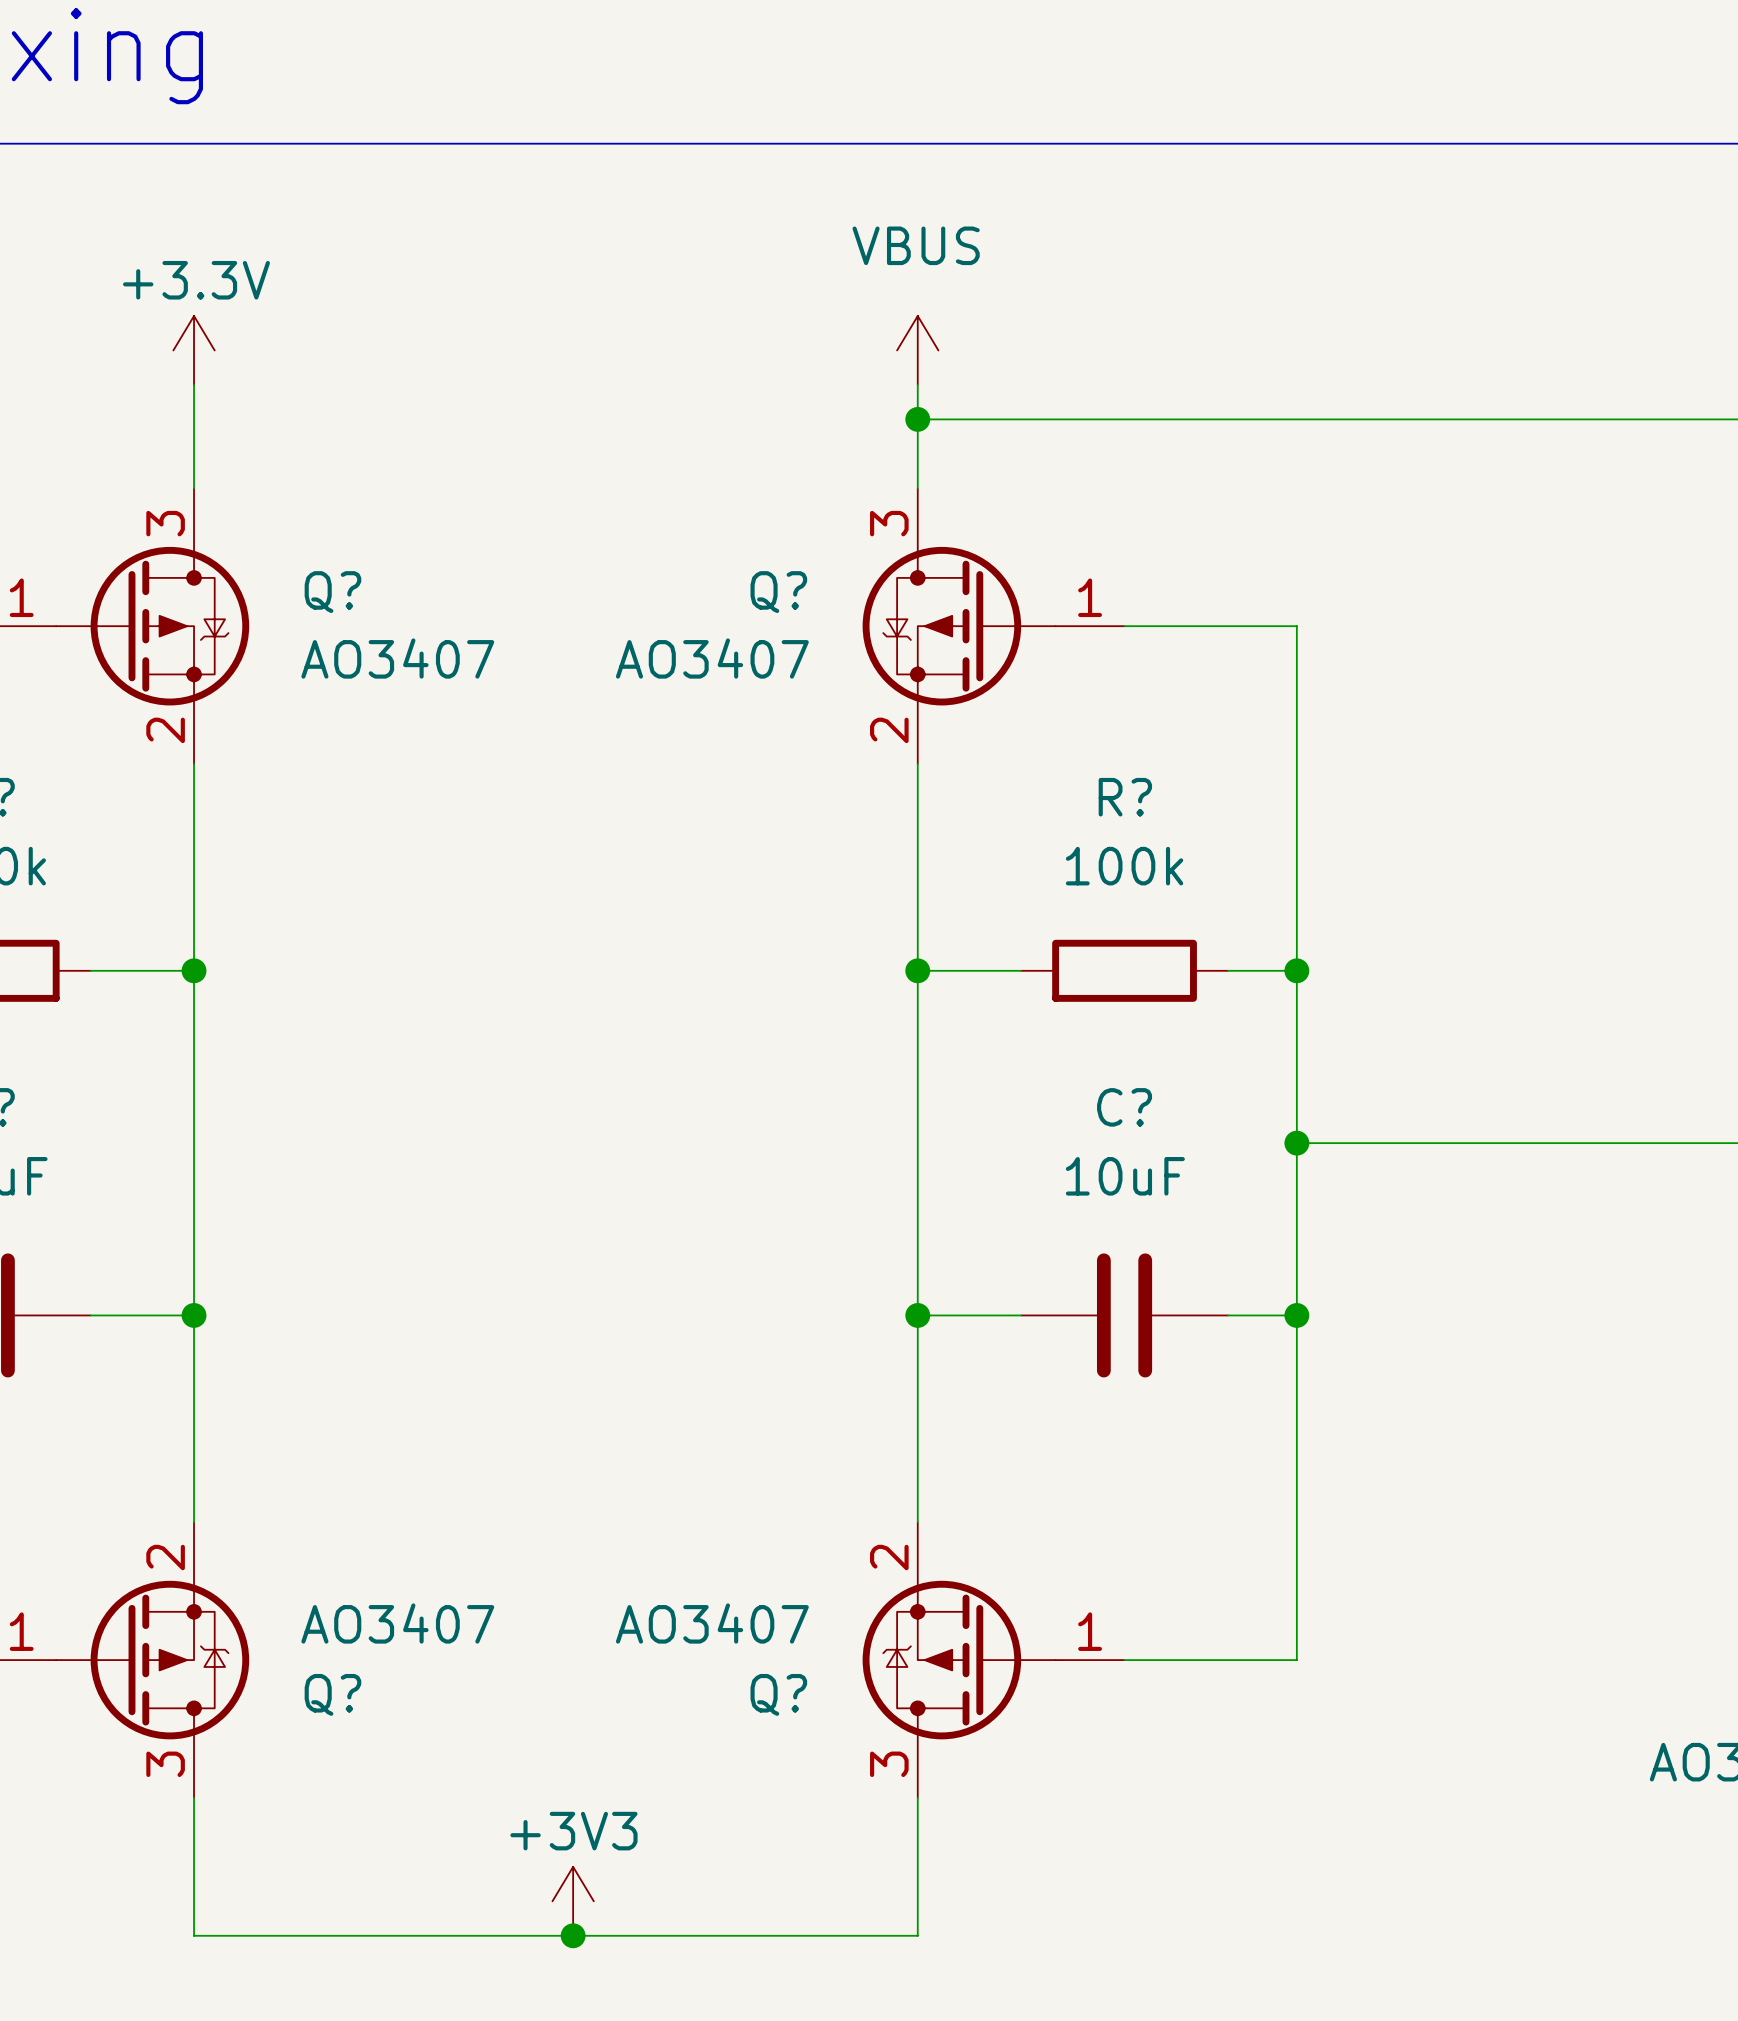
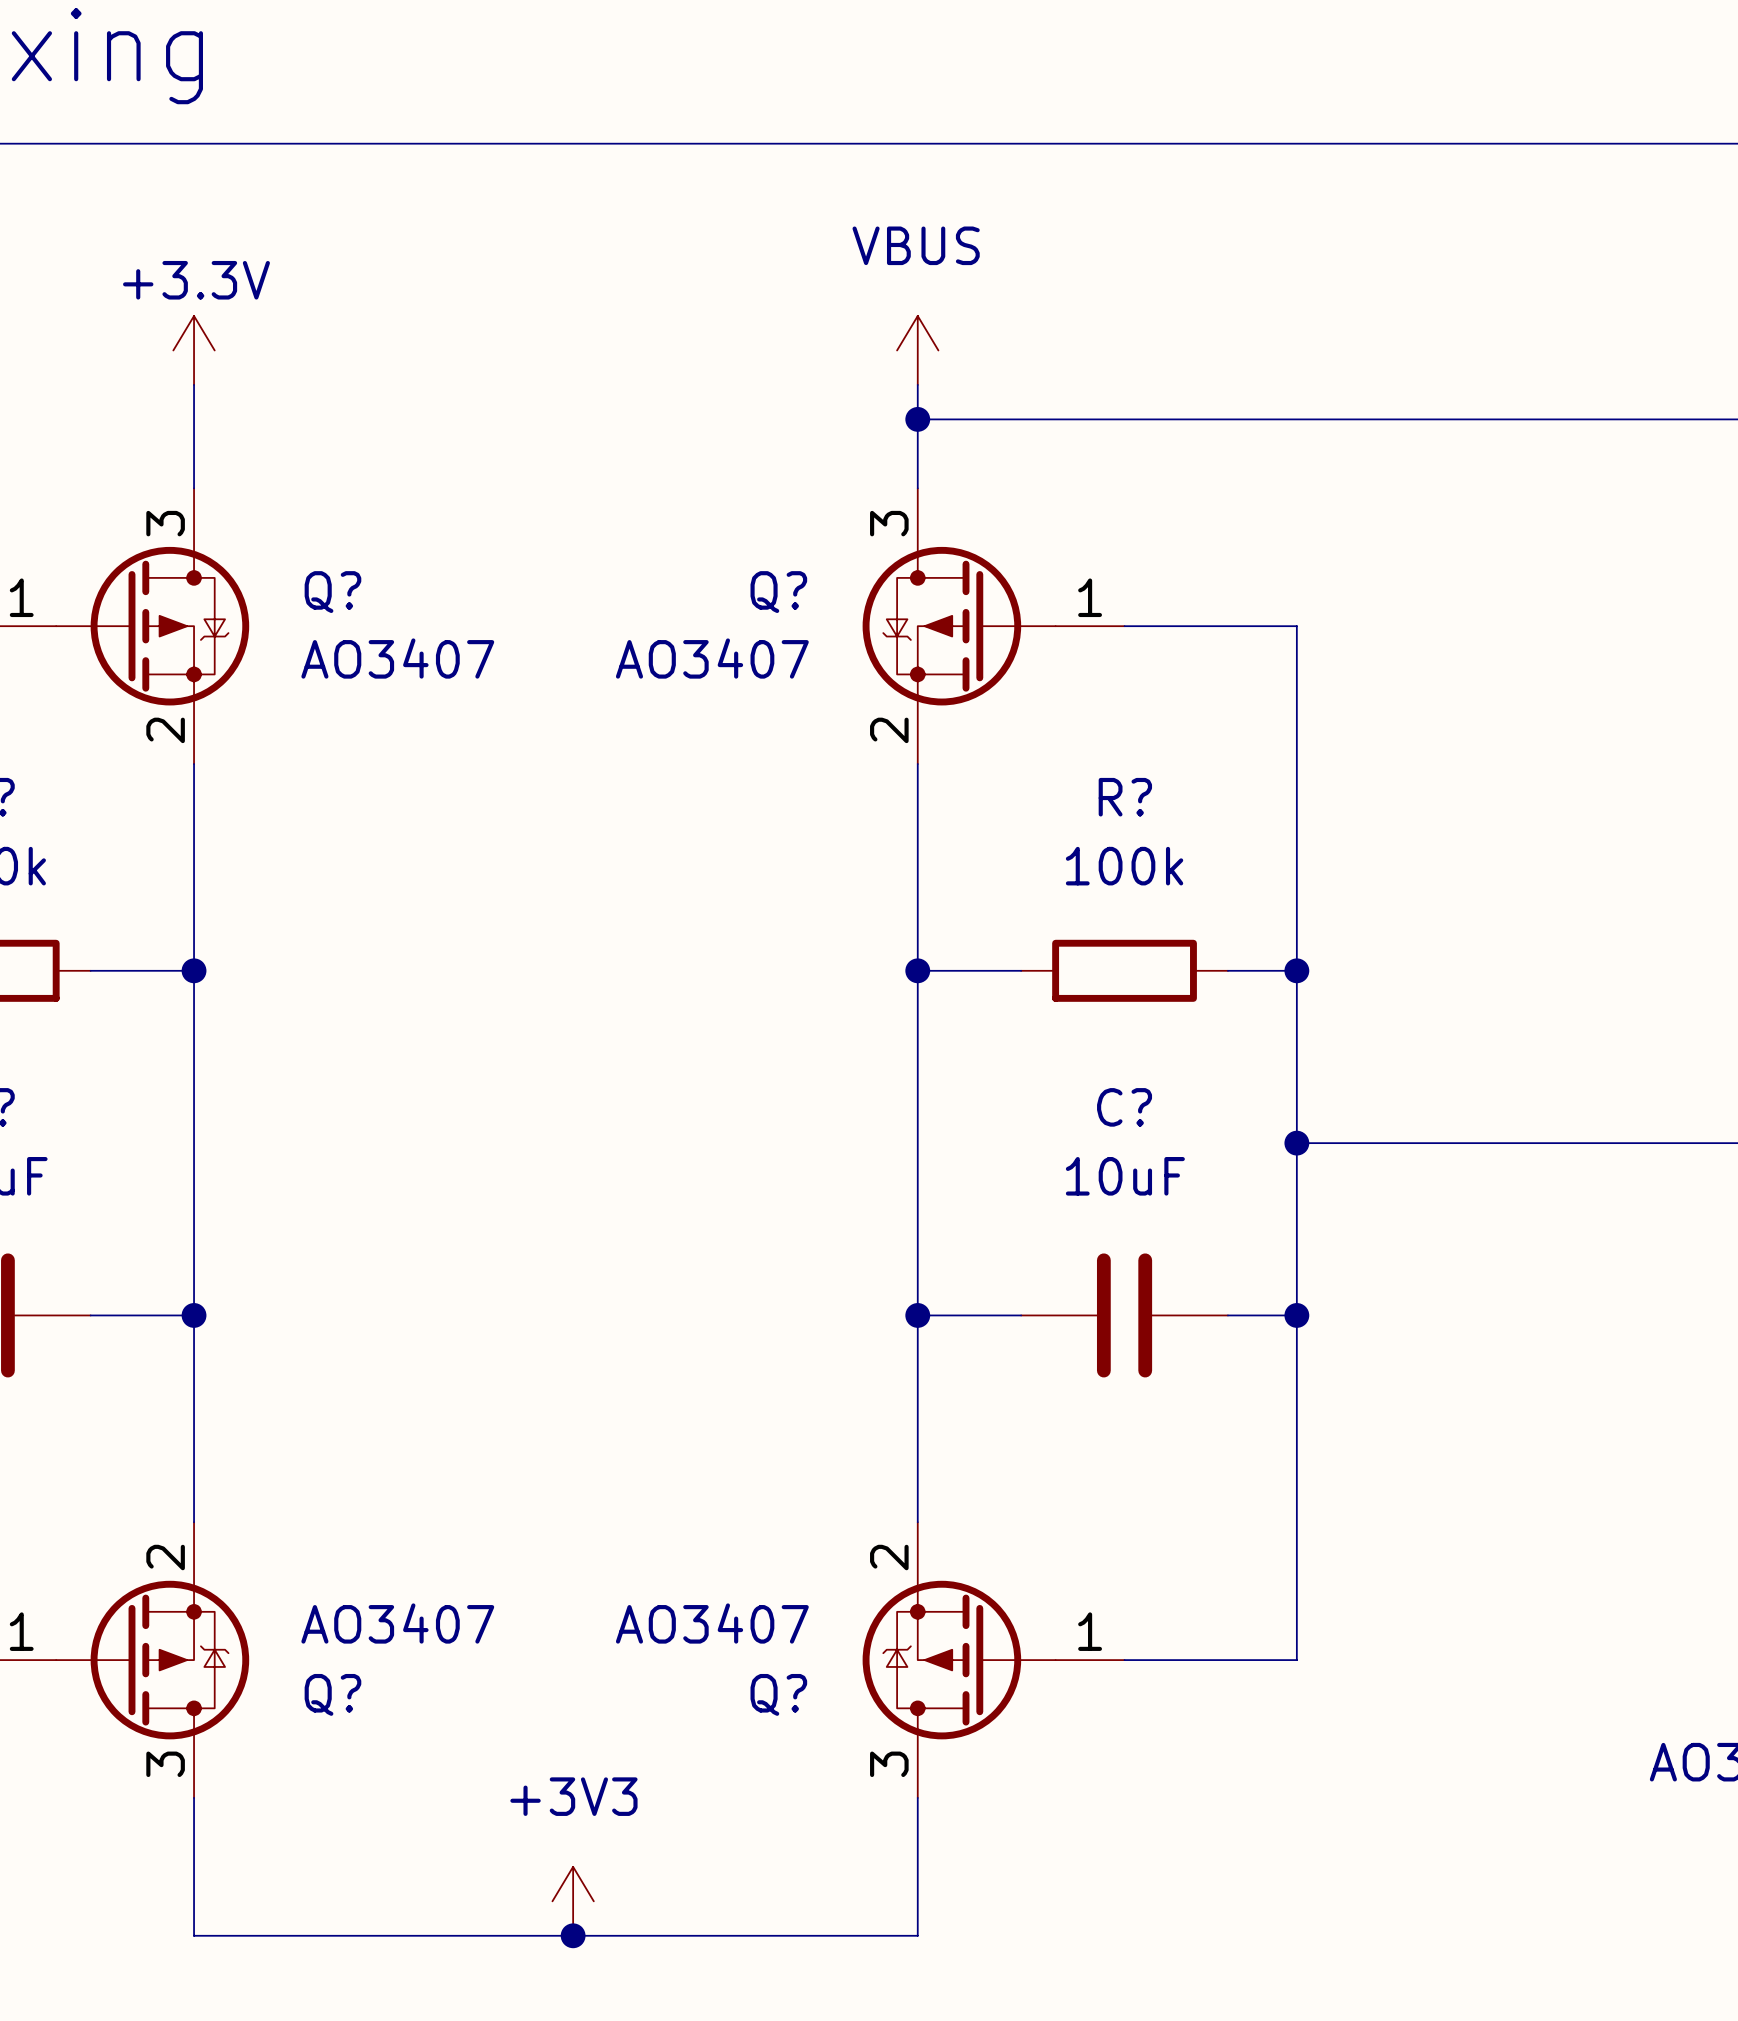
power symbol text position: +3V3 (573, 1831) -> +3V3 (573, 1796)

